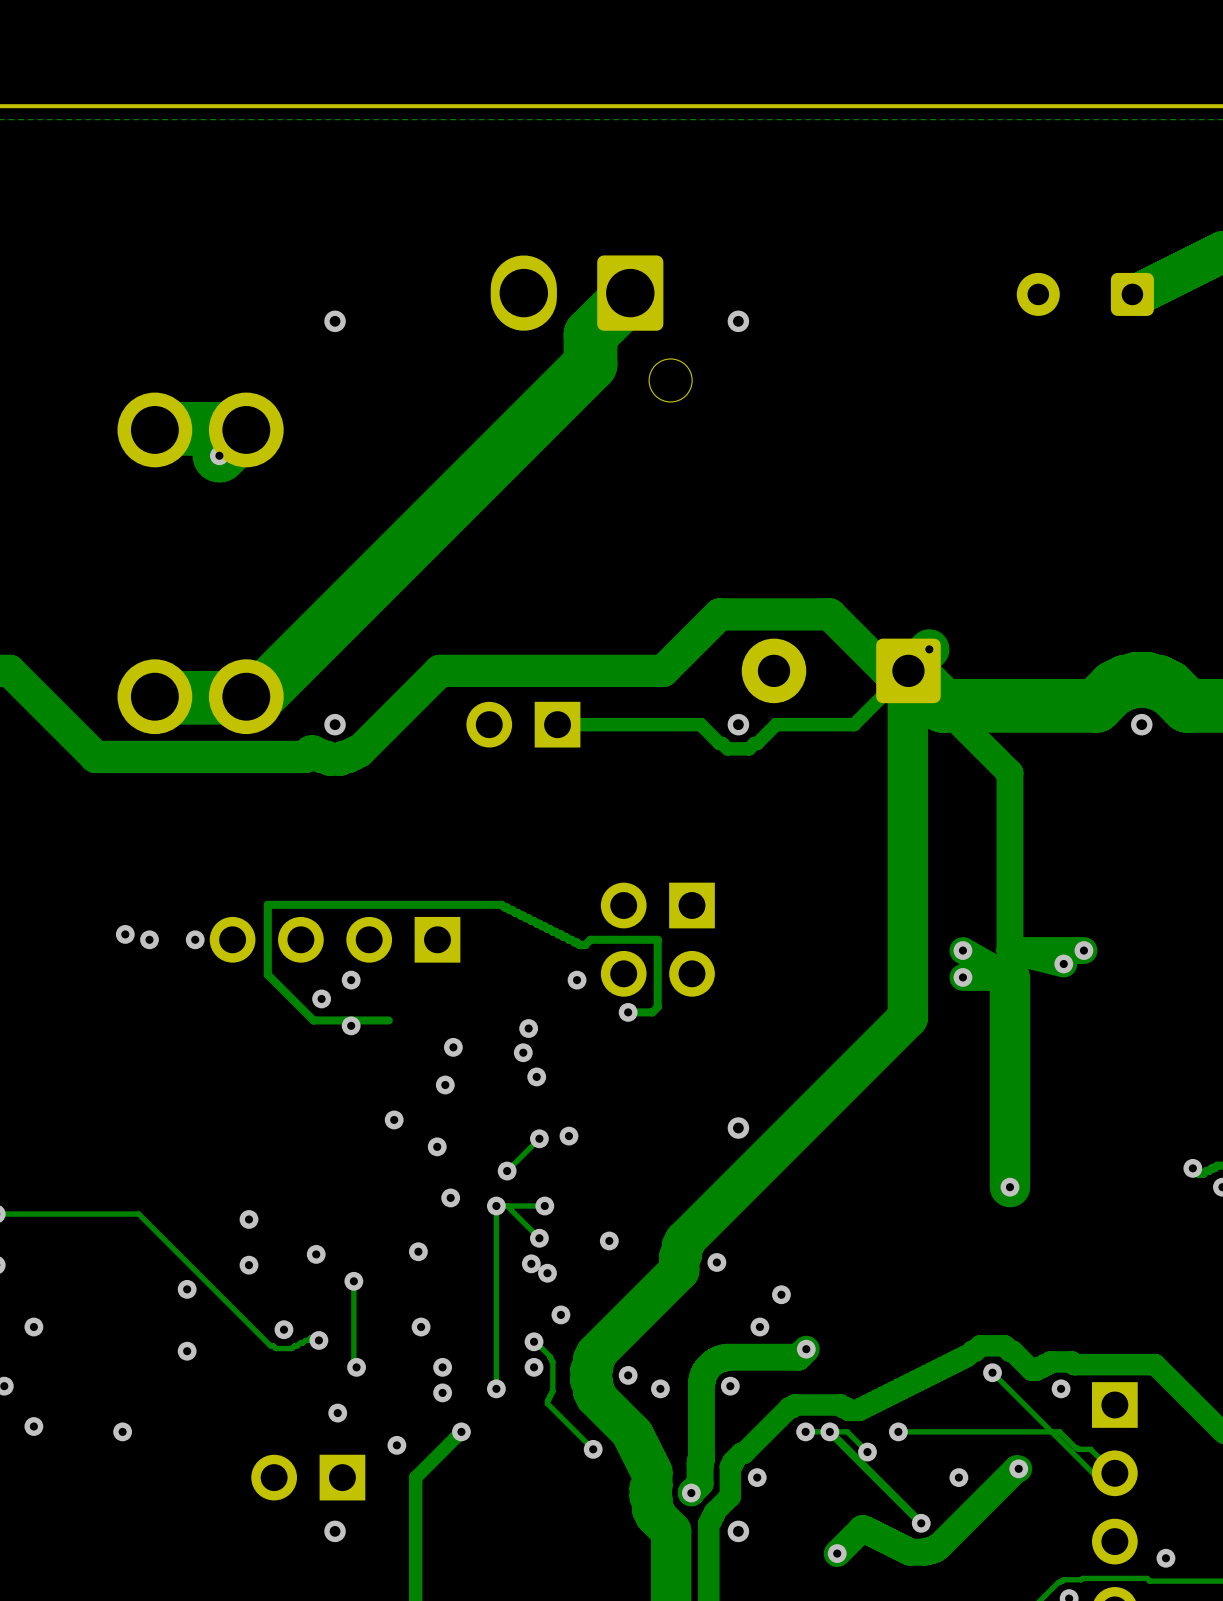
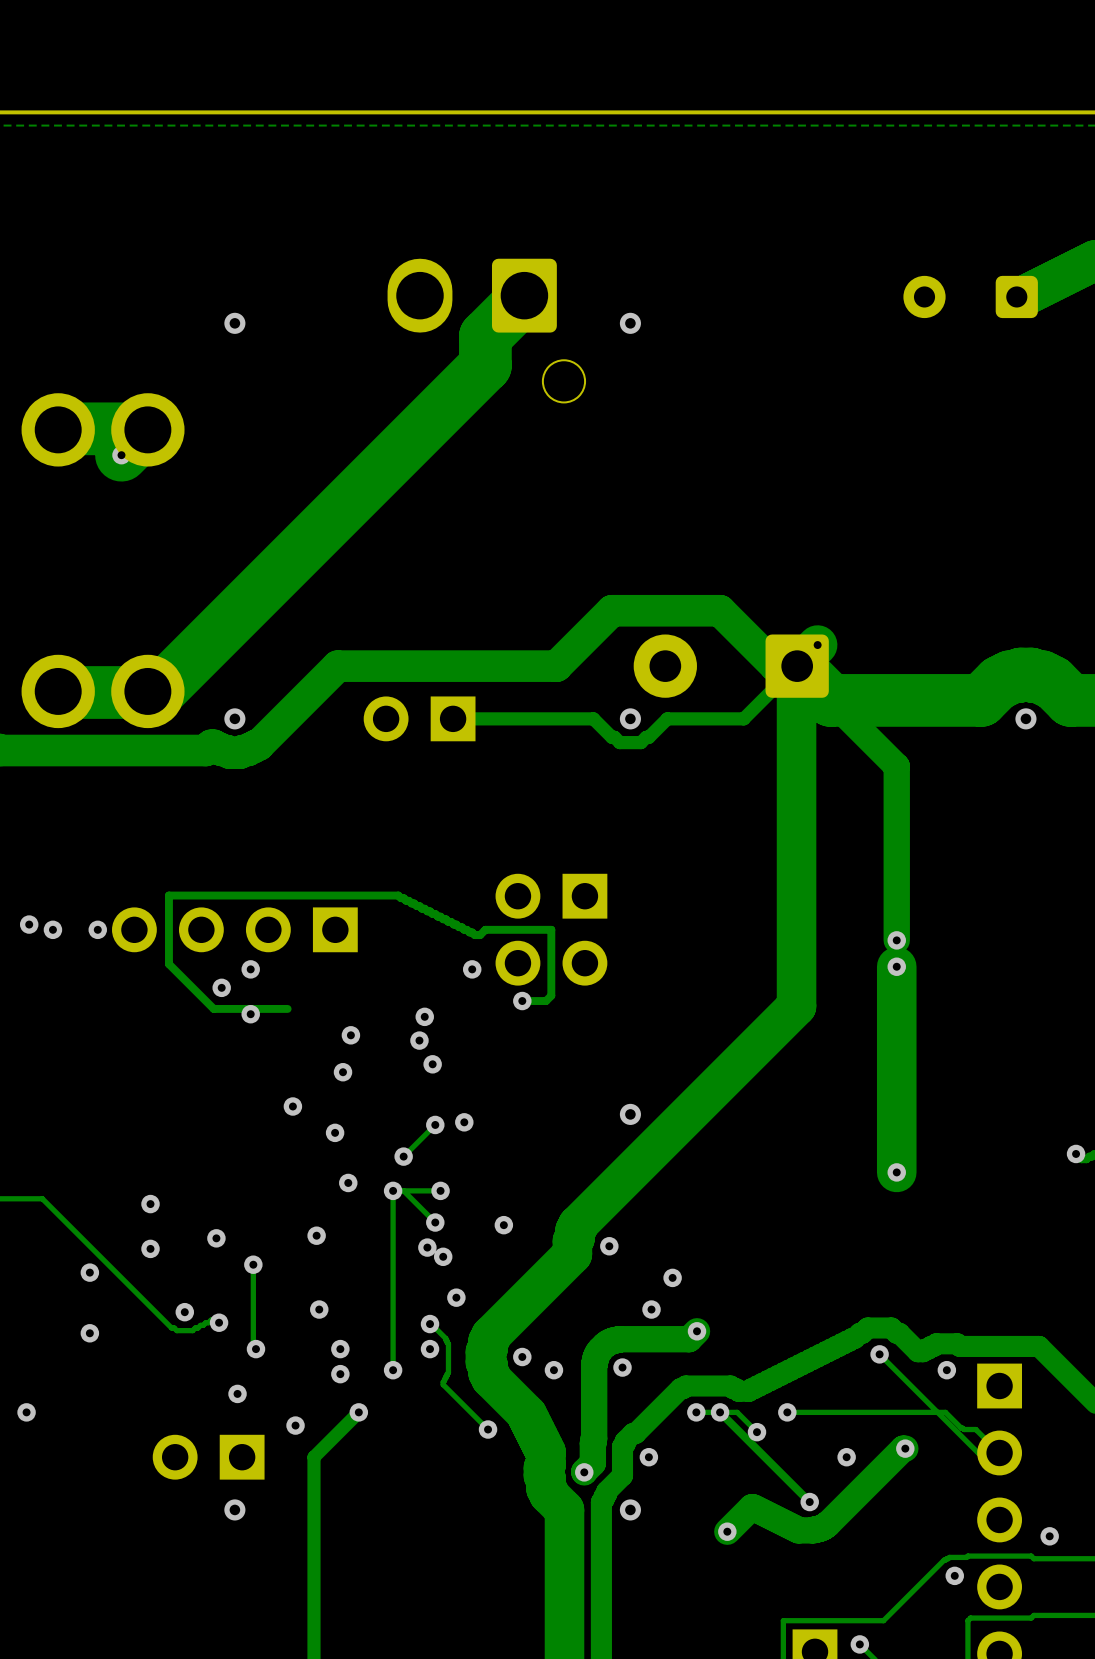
track: (962, 950) (1009, 977) (962, 977) -> none
via: (962, 950) -> none
via: none -> (896, 940)
track: (1083, 950) (1009, 950) (1063, 963) -> none
via: (1083, 950) -> none
via: (1063, 963) -> none
via: (962, 977) -> none
via: none -> (896, 966)

